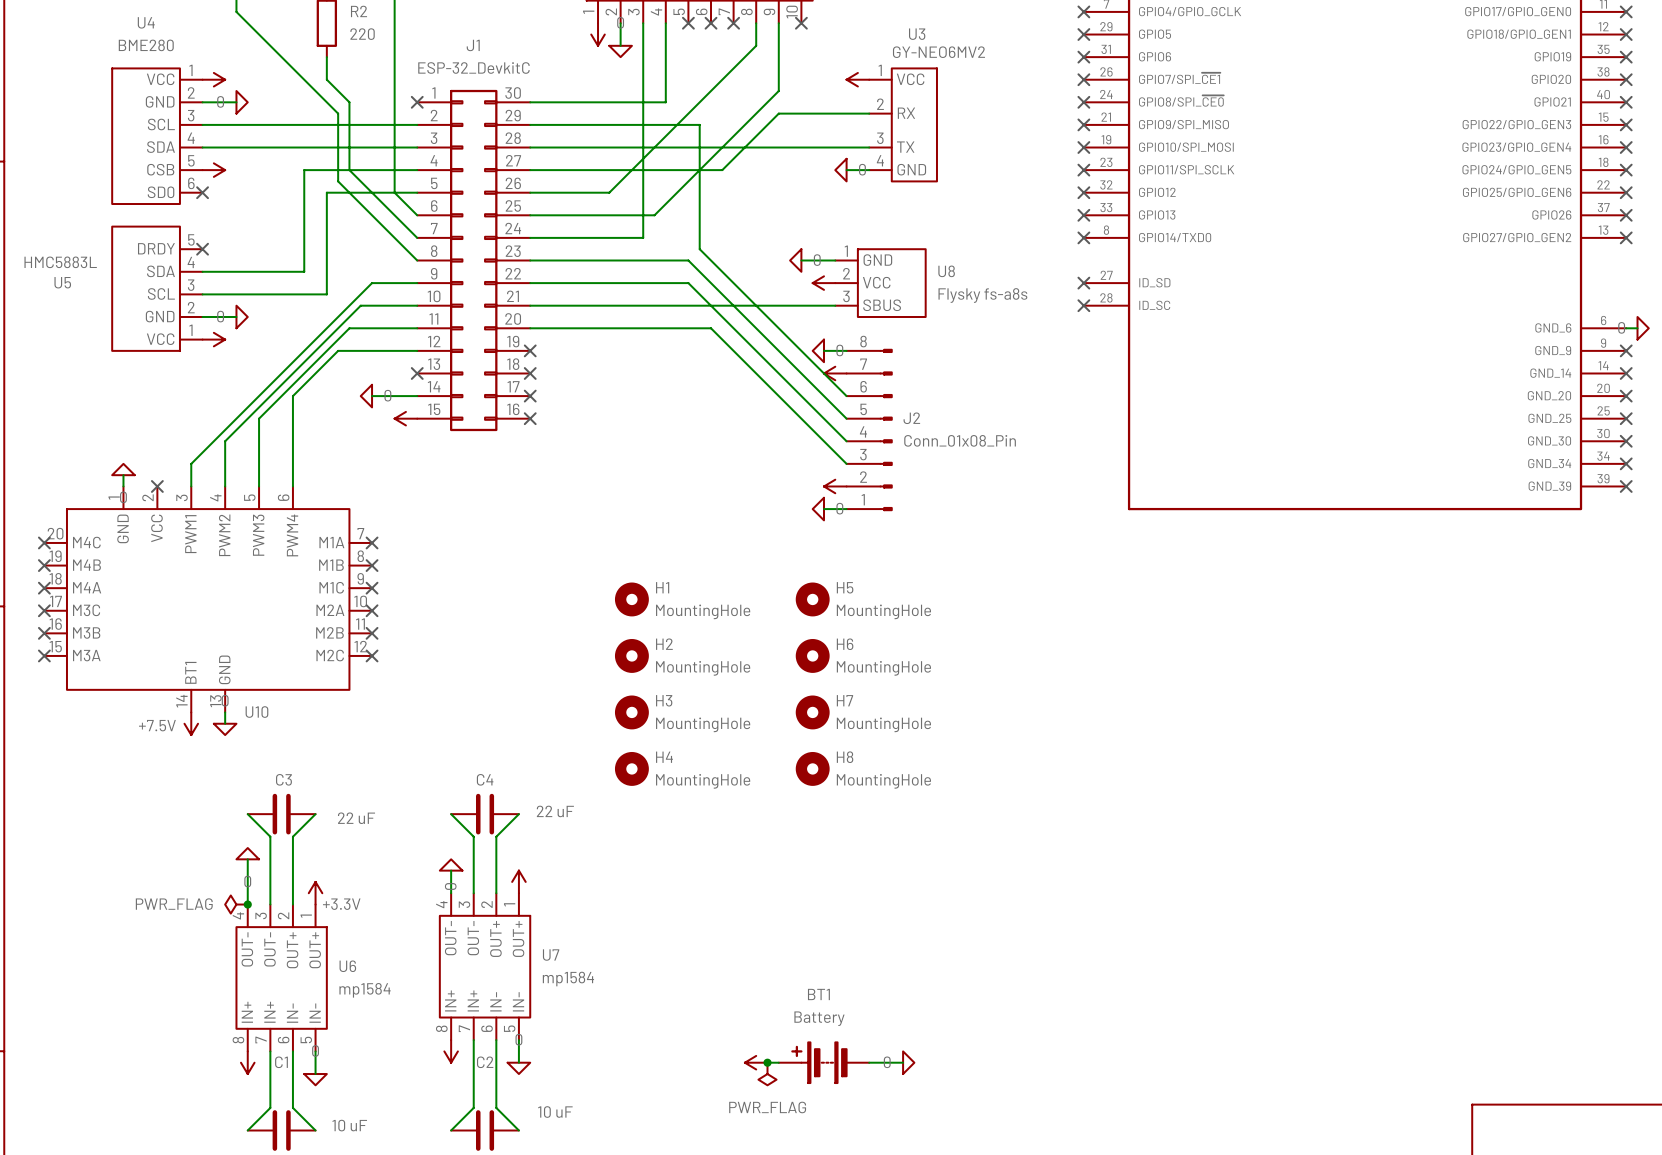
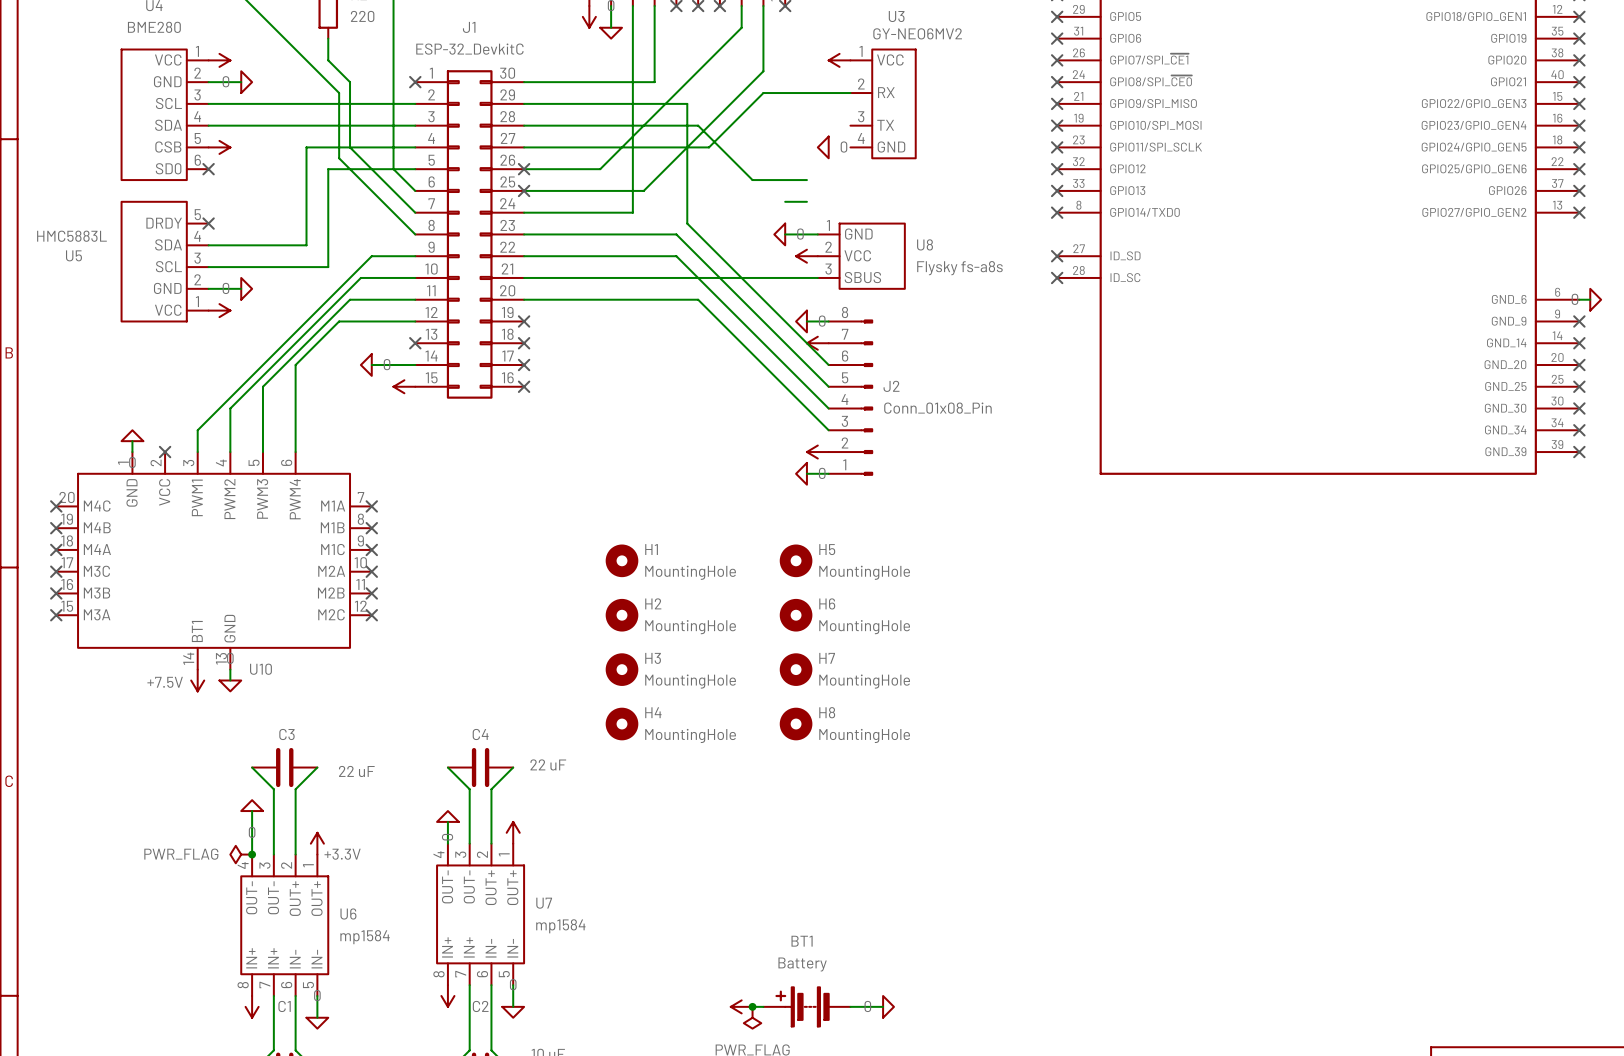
wire: (711, 147) (869, 147) -> (698, 125) (752, 180) (806, 180)
wire: (846, 170) (869, 170) -> (785, 201) (806, 201)
no-connect mark: none -> (524, 169)
no-connect mark: none -> (524, 190)

